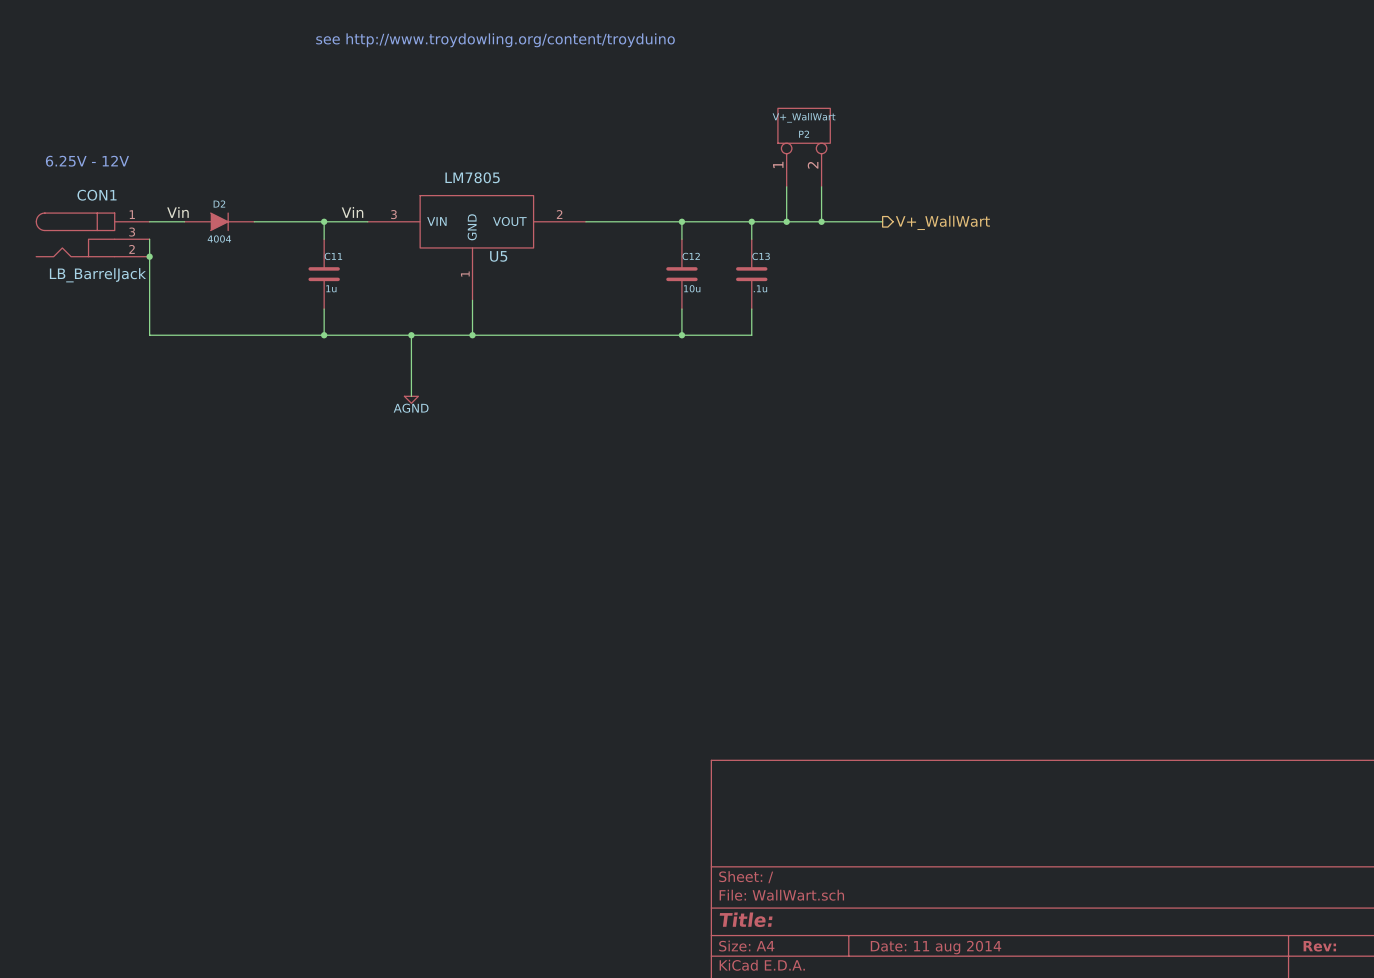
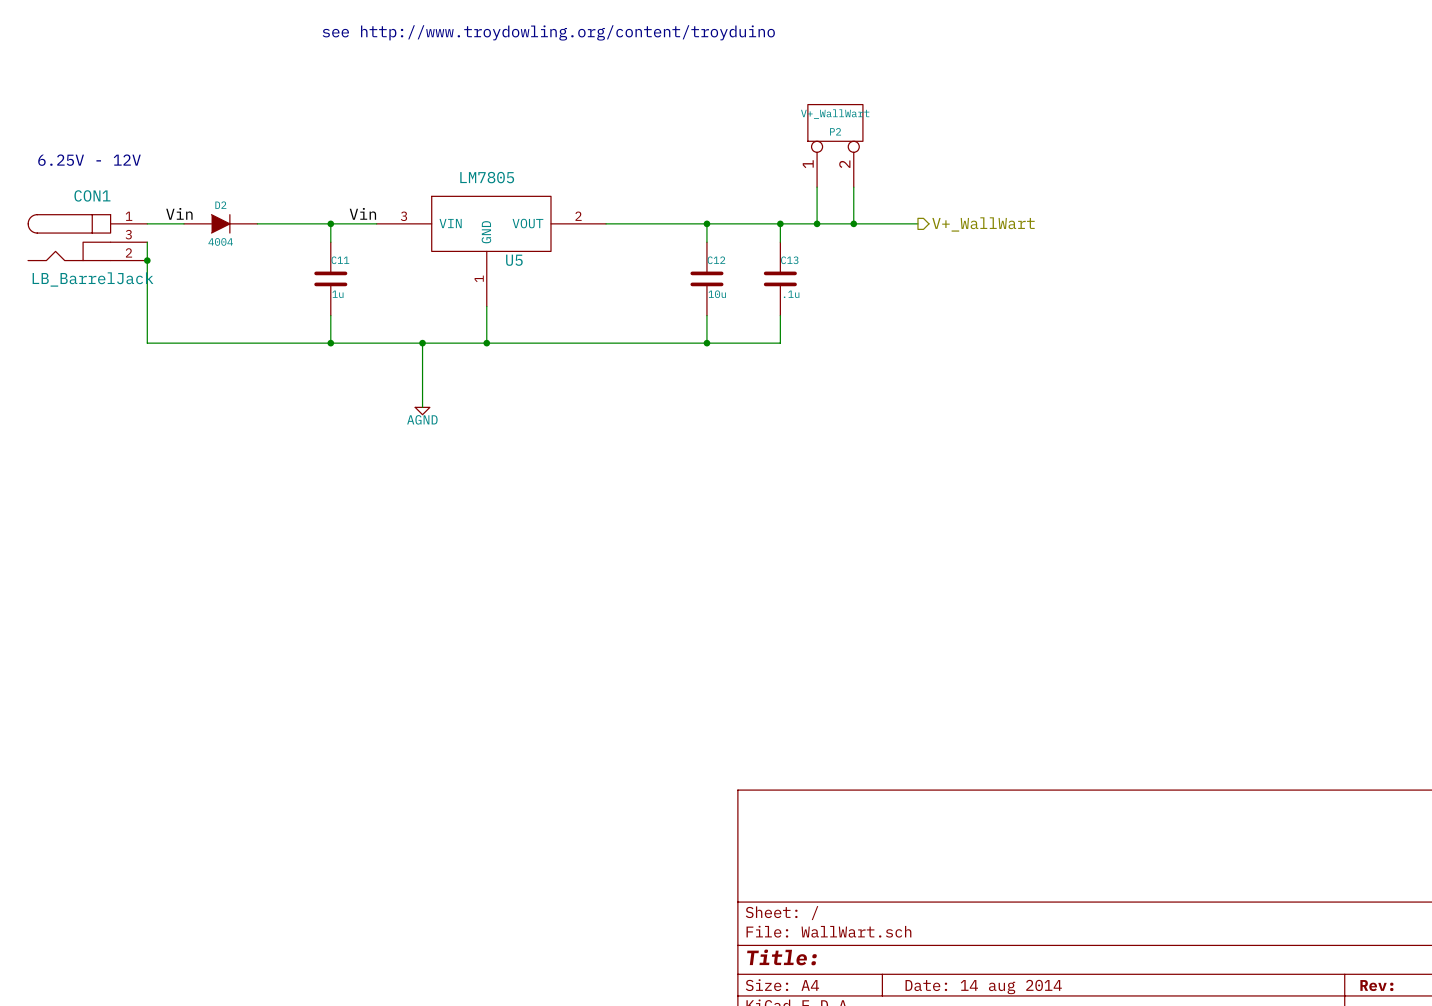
title block: Date: 11 aug 2014 (936, 947) -> Date: 14 aug 2014 (983, 987)

